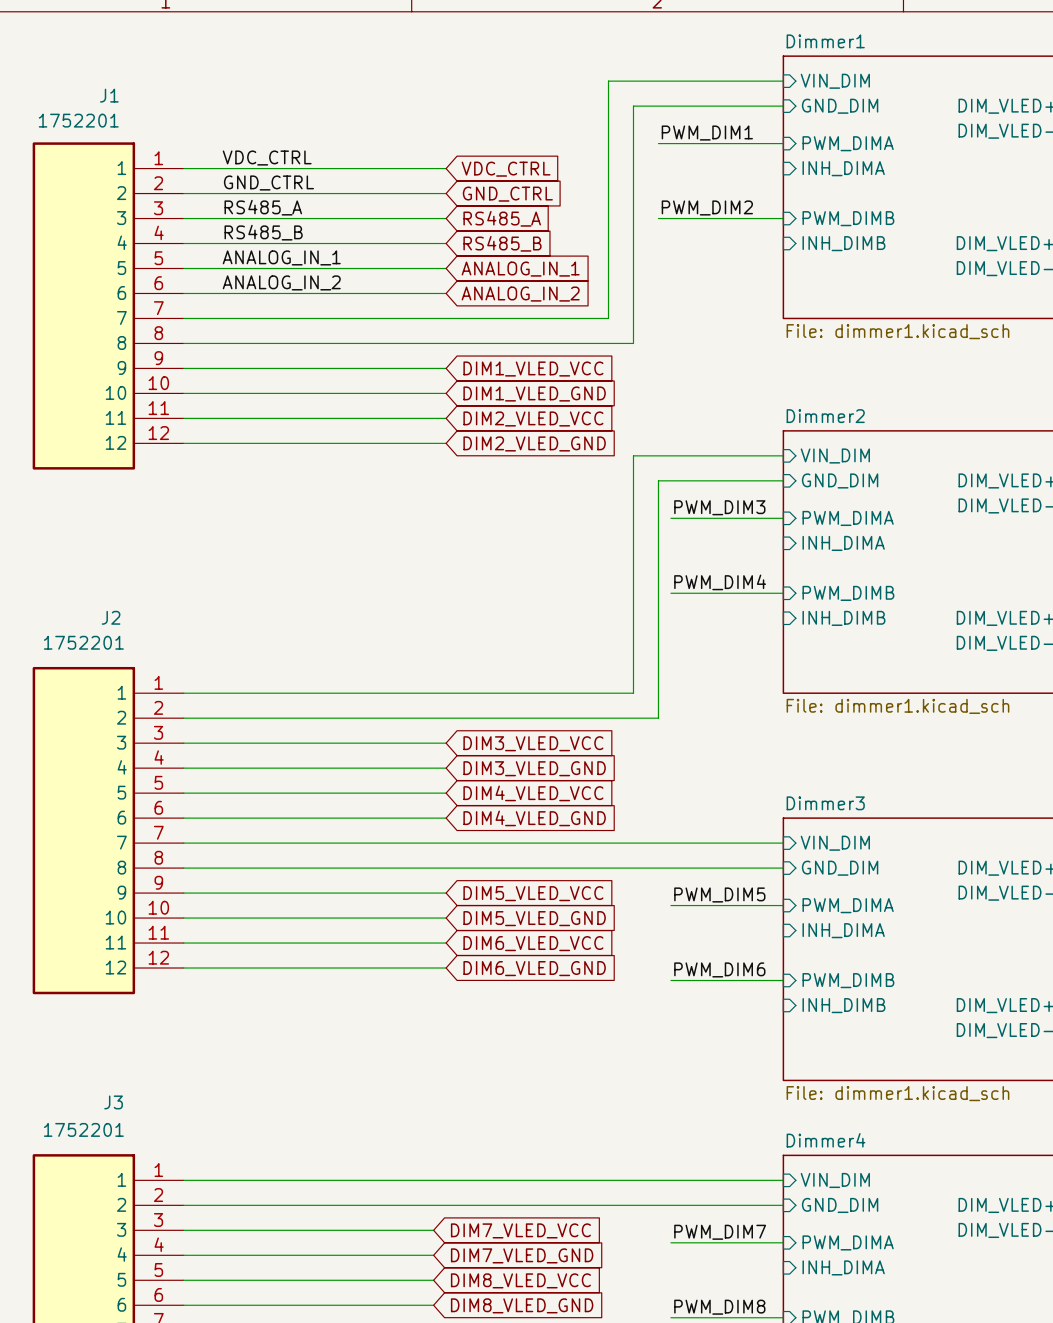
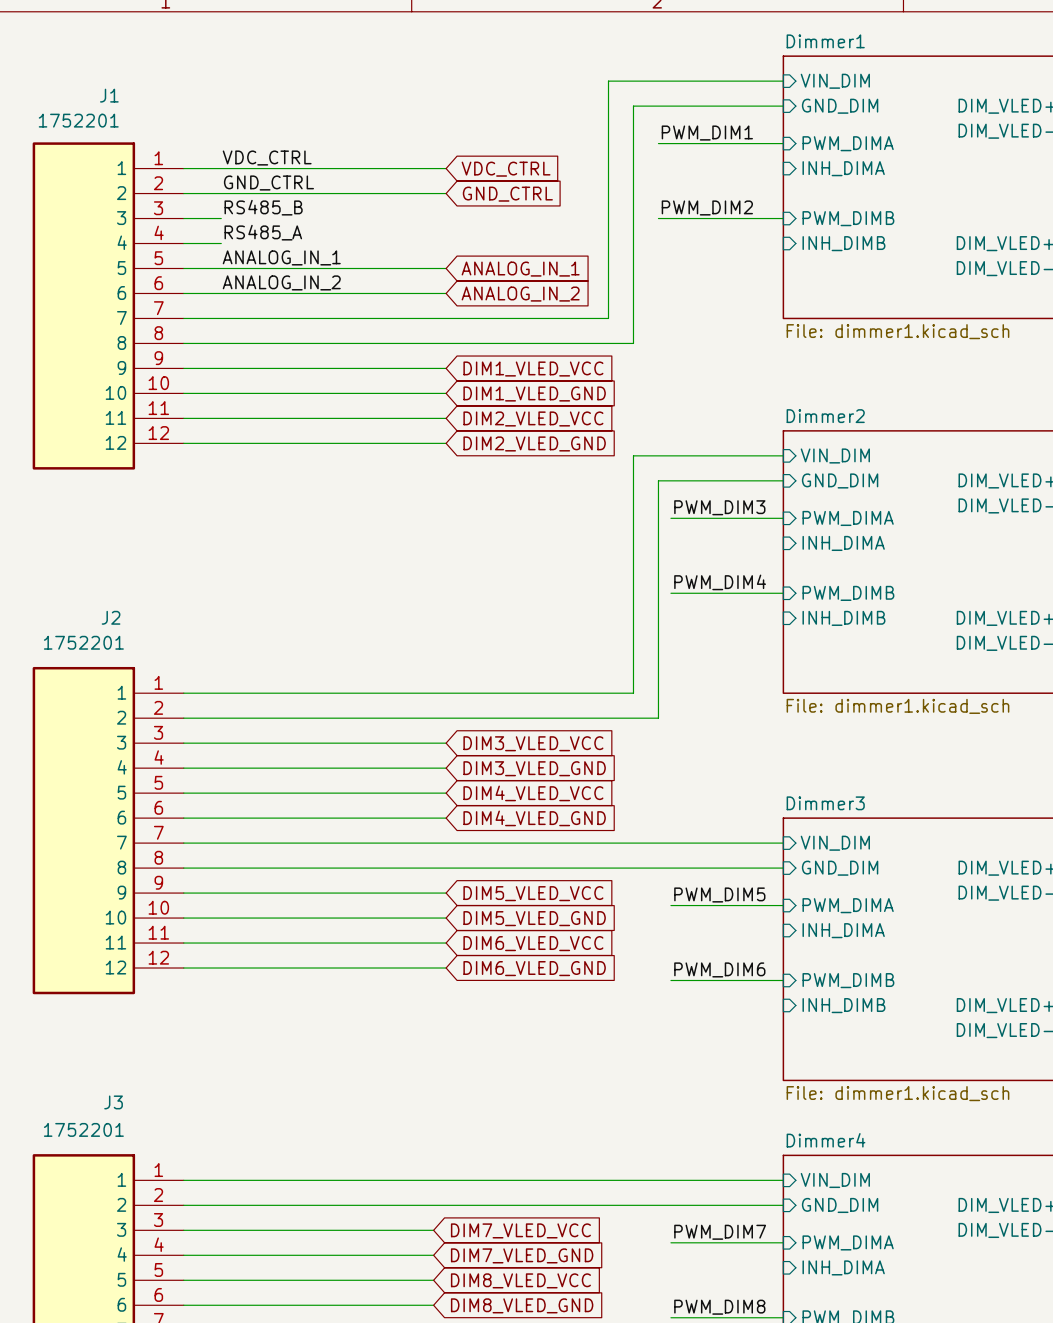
label: RS485_A (263, 207) -> RS485_B (263, 207)
wire: (221, 218) (446, 218) -> none
global label: RS485_A (502, 218) -> none
label: RS485_B (263, 232) -> RS485_A (263, 232)
wire: (221, 243) (446, 243) -> none
global label: RS485_B (502, 243) -> none

